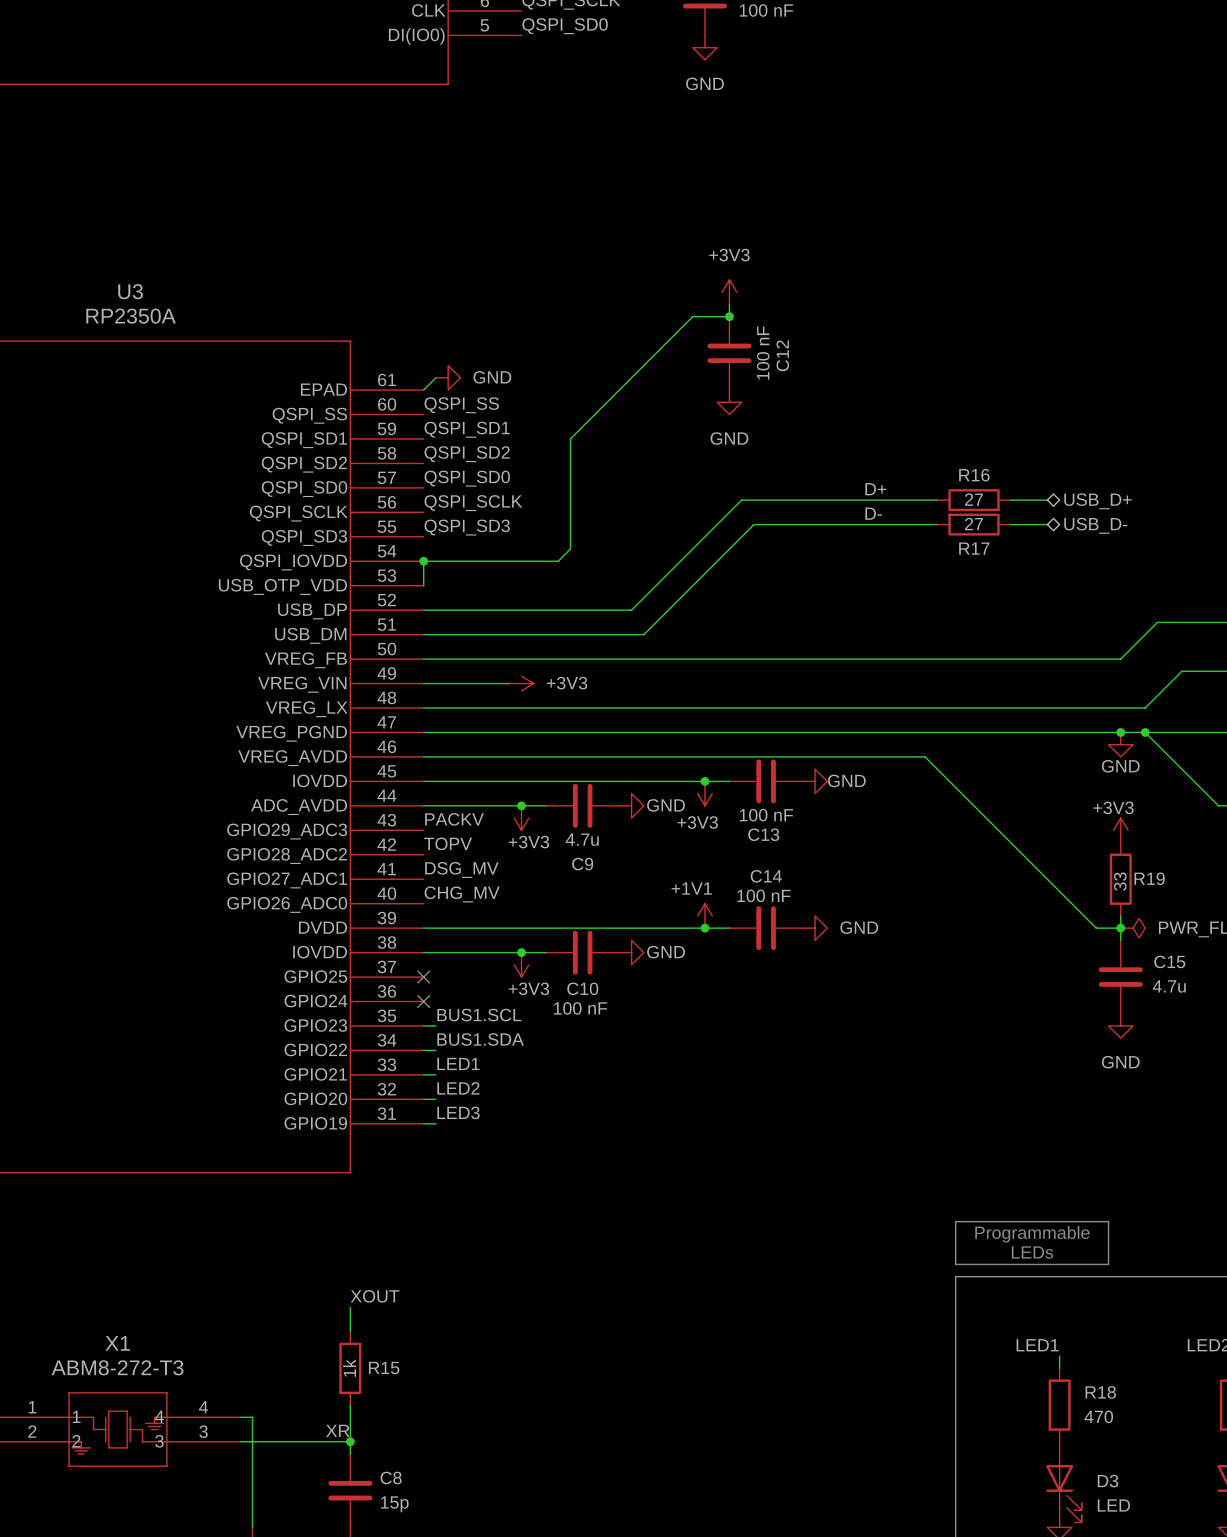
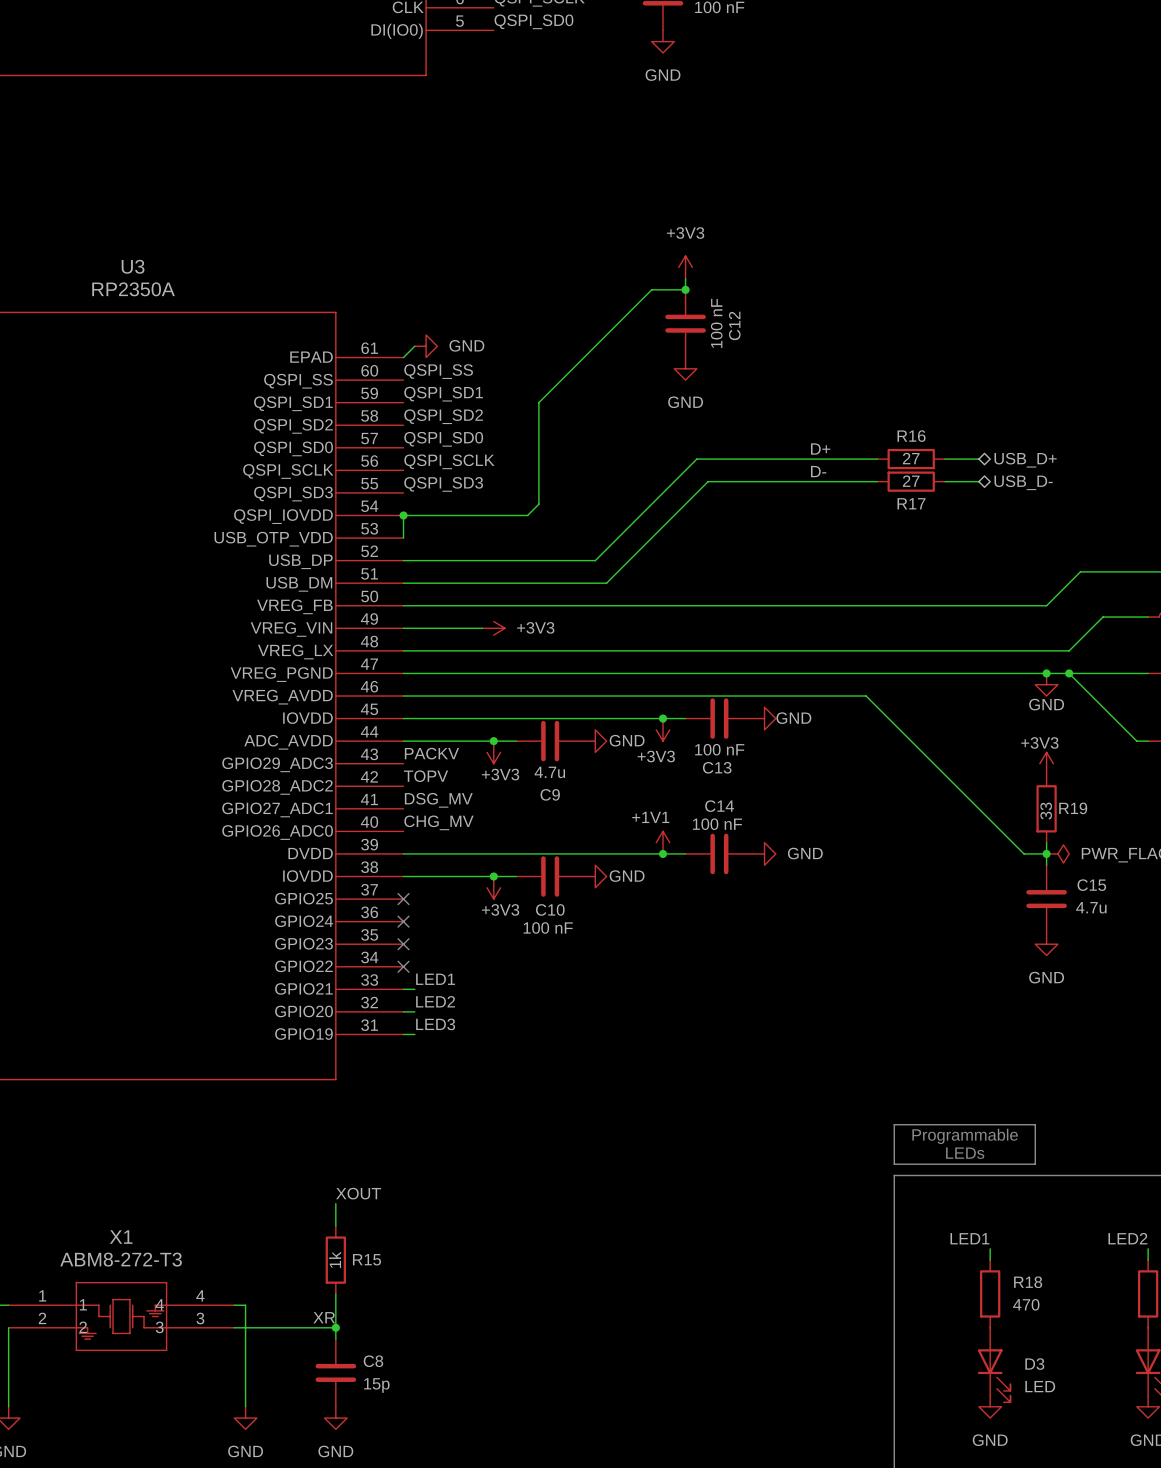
label: BUS1.SCL (479, 1015) -> none
wire: (423, 1025) (435, 1025) -> none
no-connect mark: none -> (403, 944)
label: BUS1.SDA (480, 1039) -> none
wire: (423, 1050) (435, 1050) -> none
no-connect mark: none -> (403, 966)

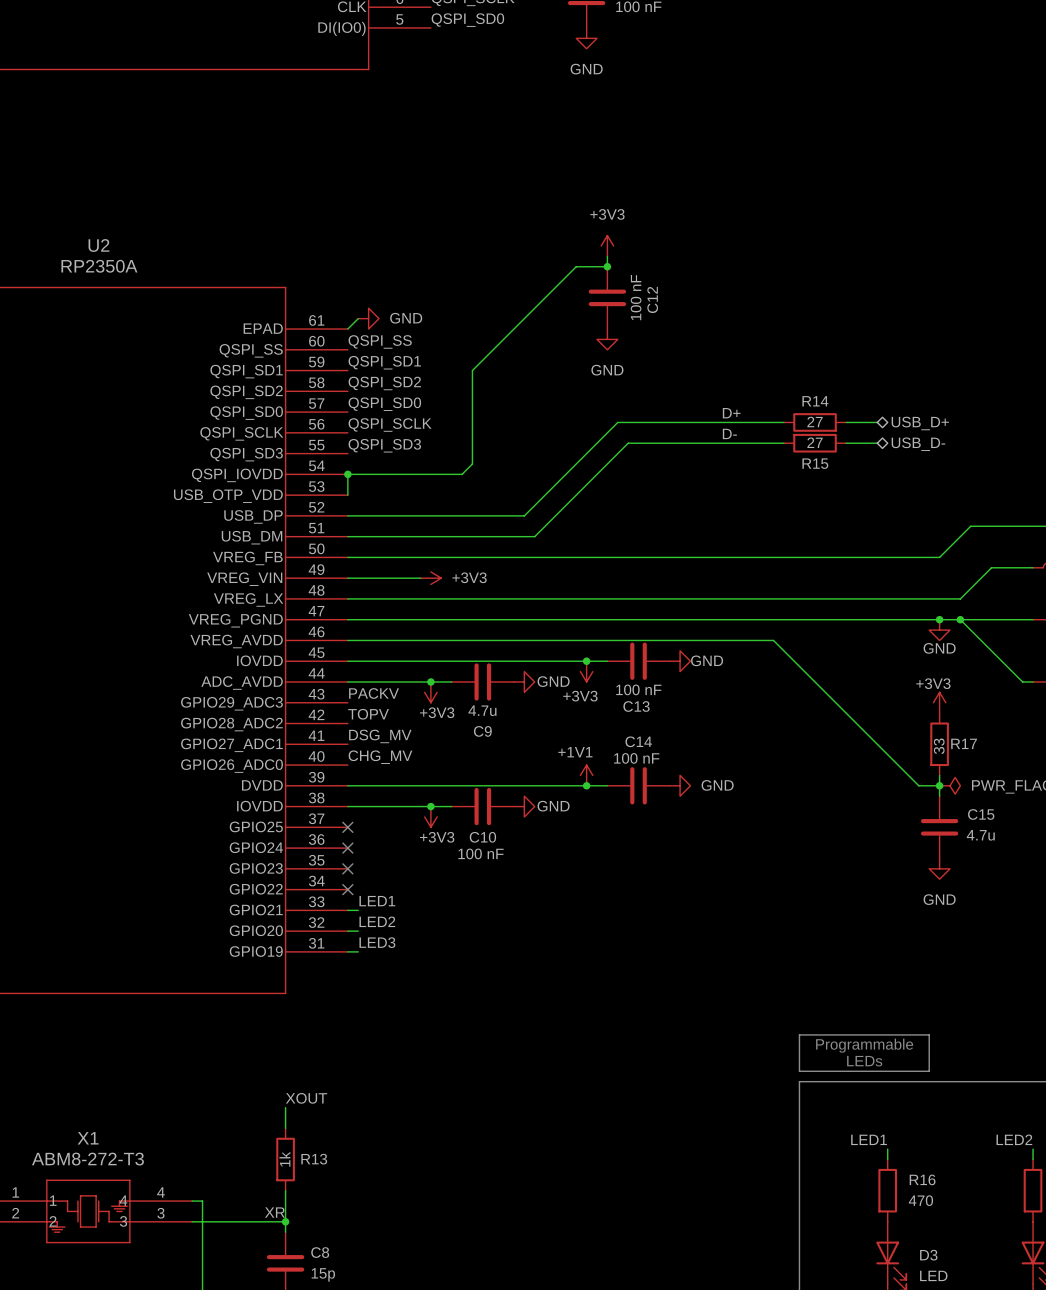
U3 name: U3 (133, 266) -> U2 (98, 245)
R16 name: R16 (911, 436) -> R14 (815, 401)
R17 name: R17 (911, 503) -> R15 (815, 463)
R19 name: R19 (1073, 808) -> R17 (964, 743)
R15 name: R15 (366, 1259) -> R13 (314, 1159)
R18 name: R18 (1028, 1282) -> R16 (922, 1179)

